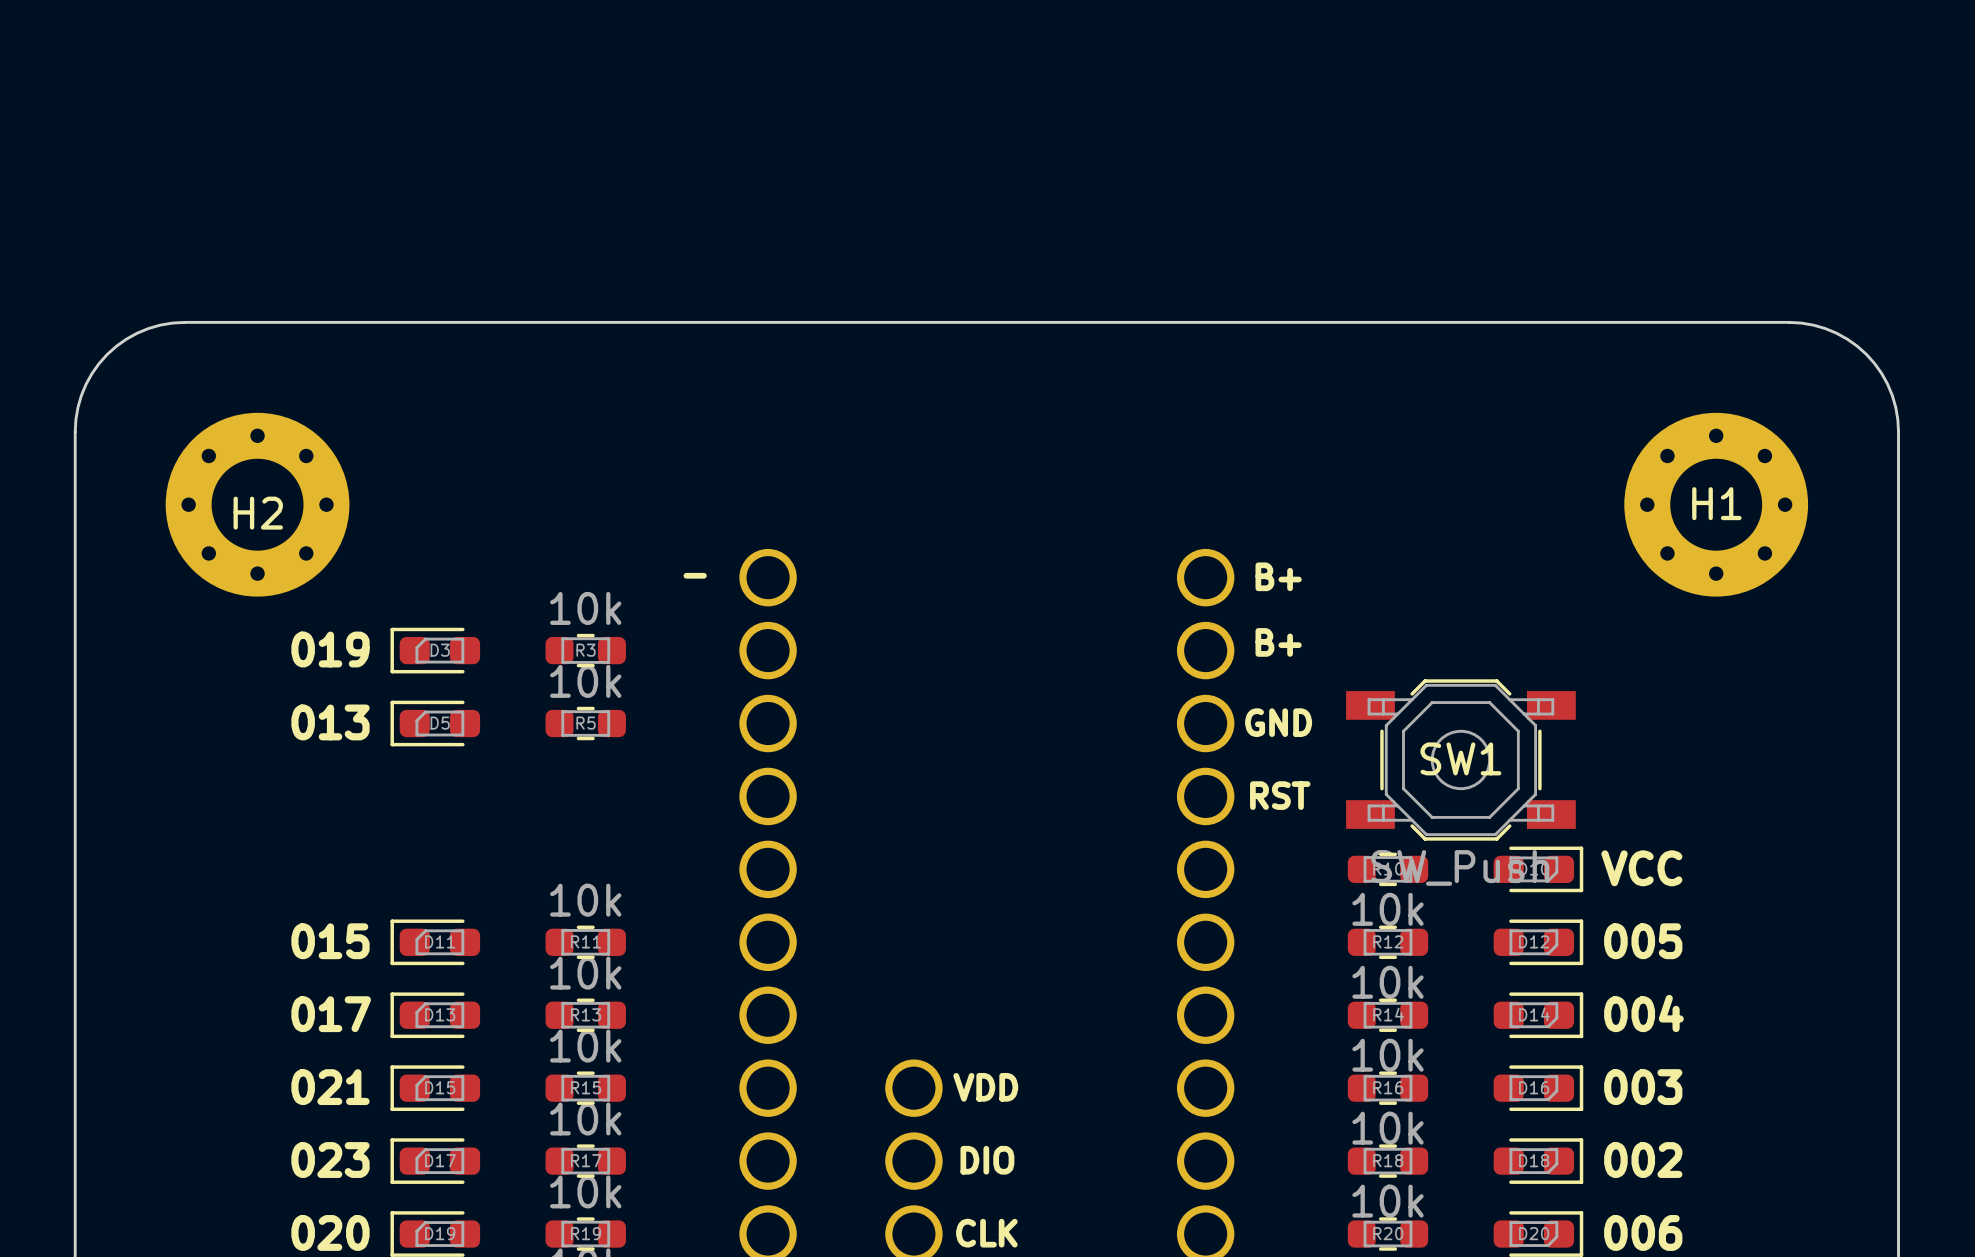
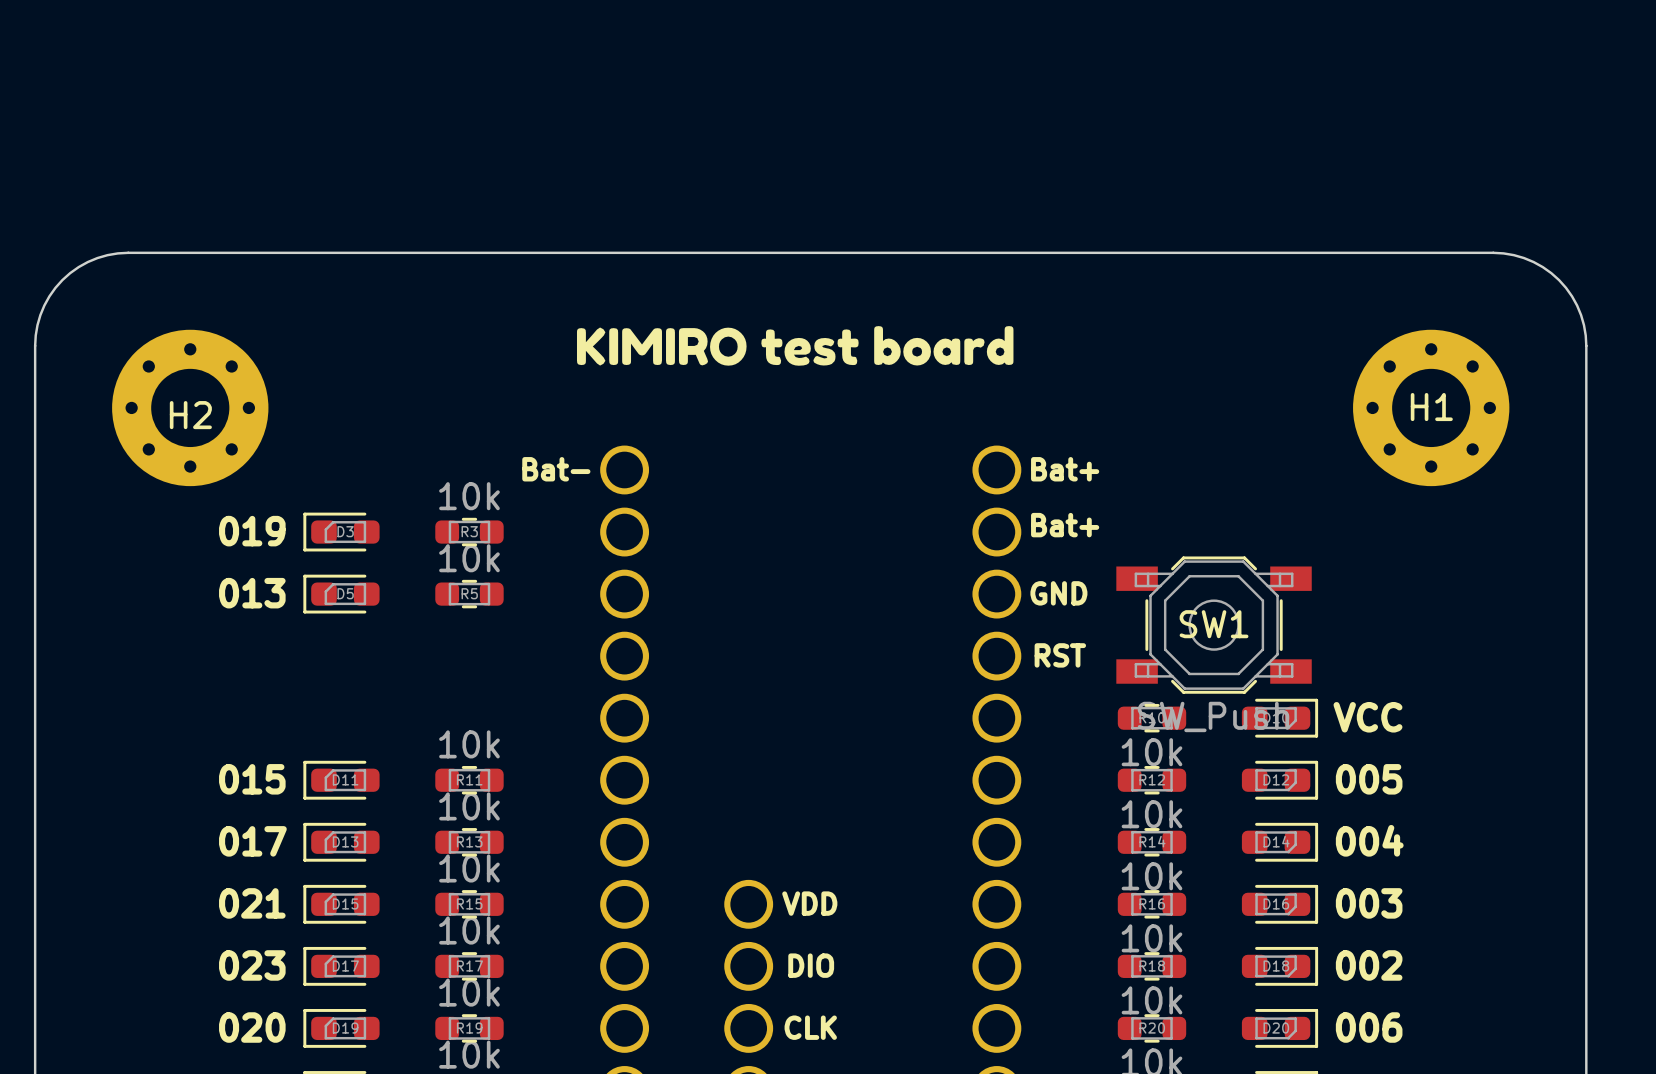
drawing: none -> [576, 326, 1014, 366]
text: - (695, 575) -> Bat- (556, 469)
text: B+ (1278, 576) -> Bat+ (1065, 469)
text: B+ (1278, 642) -> Bat+ (1065, 525)

